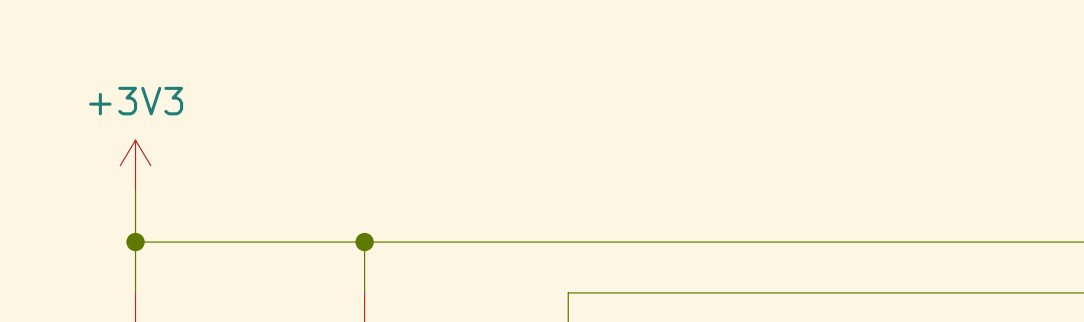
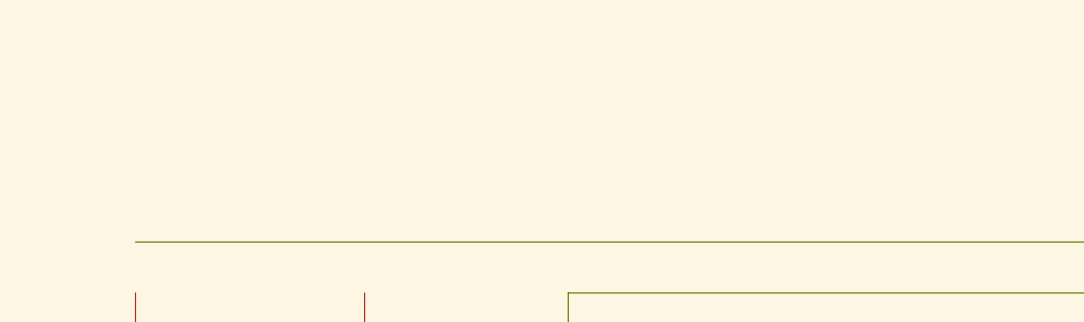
power symbol: +3V3 (135, 165) -> none
wire: (135, 191) (135, 292) -> none
junction: (135, 242) -> none
wire: (364, 242) (364, 292) -> none
junction: (364, 242) -> none

